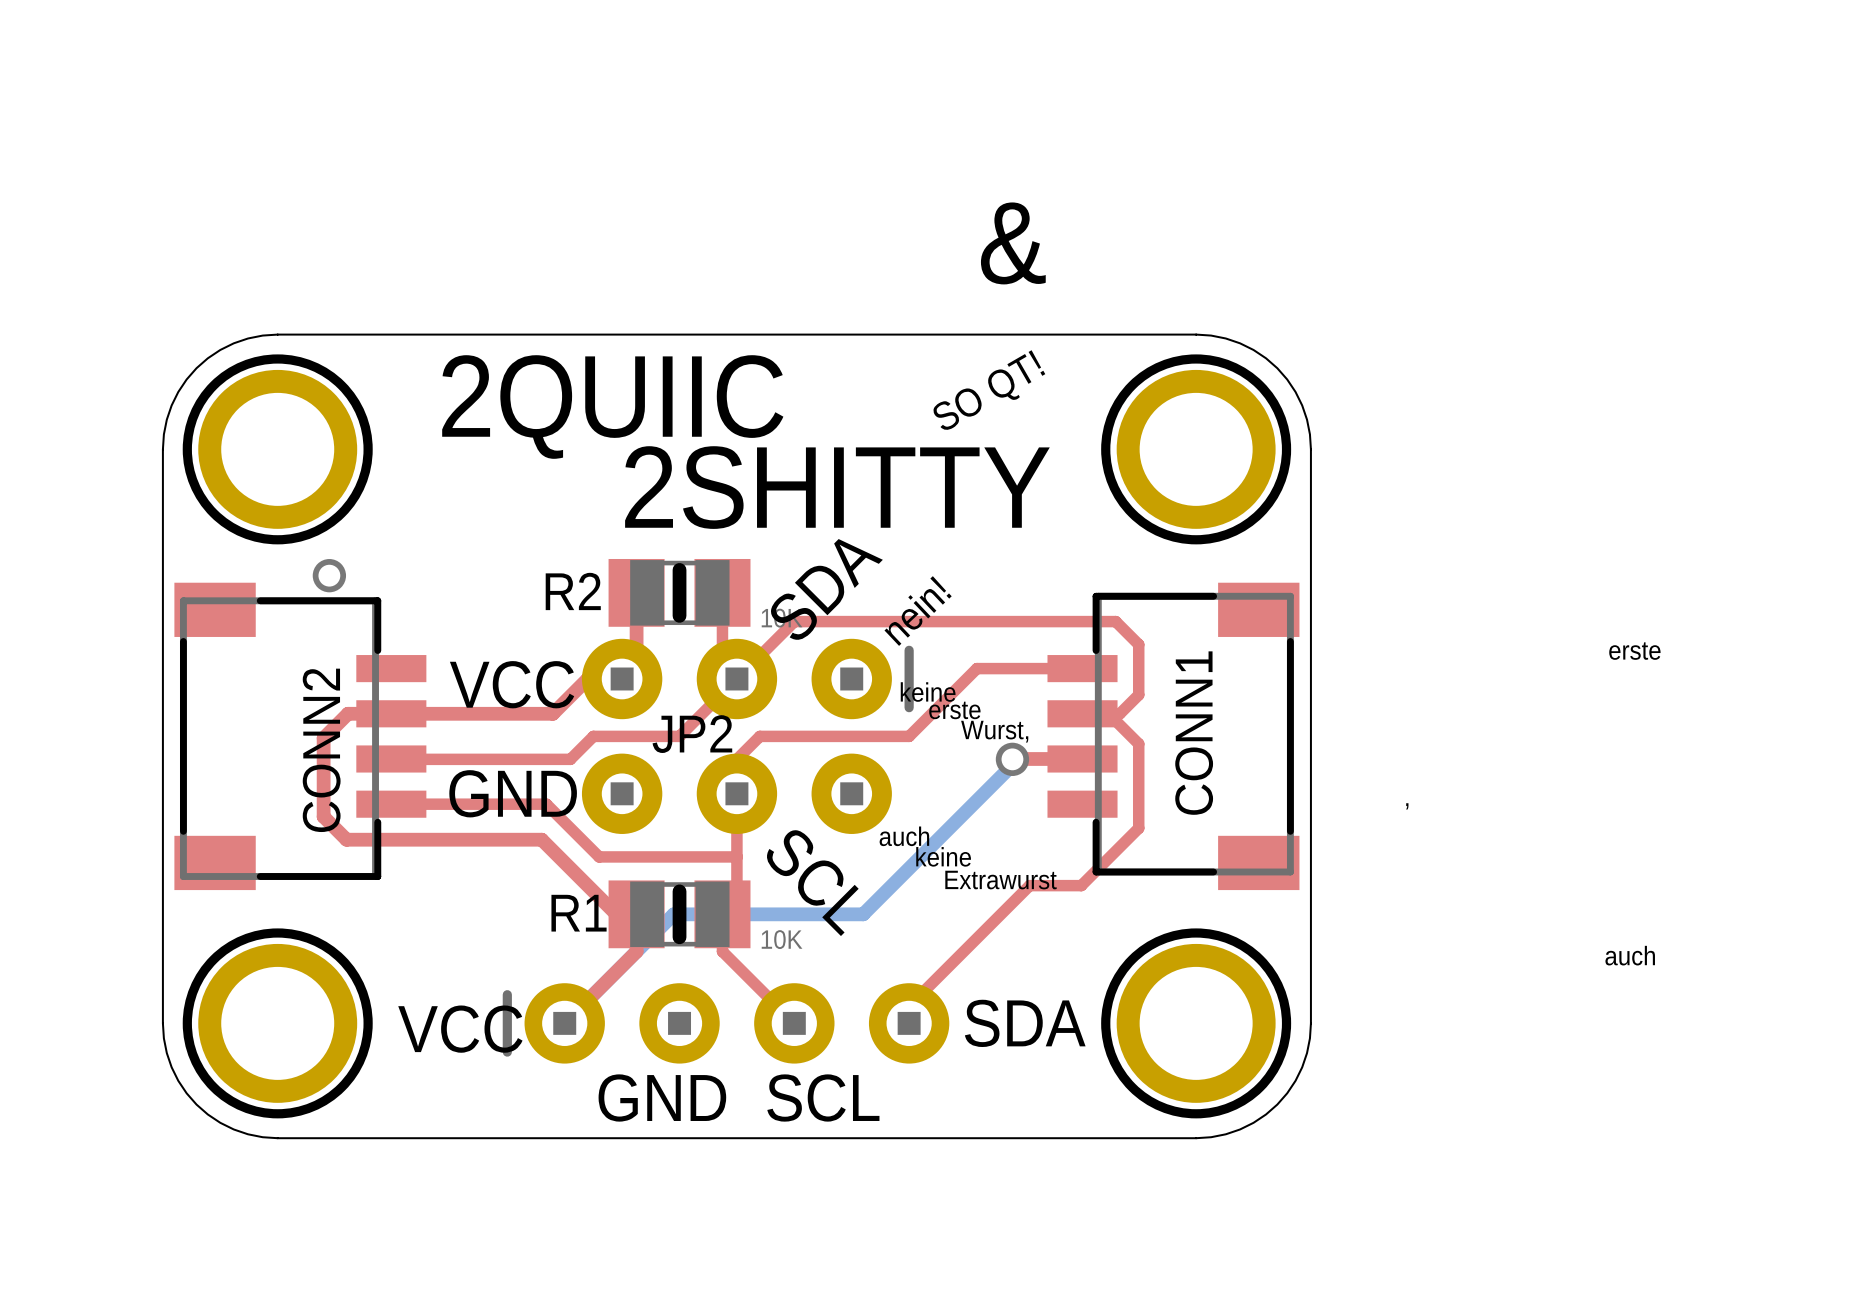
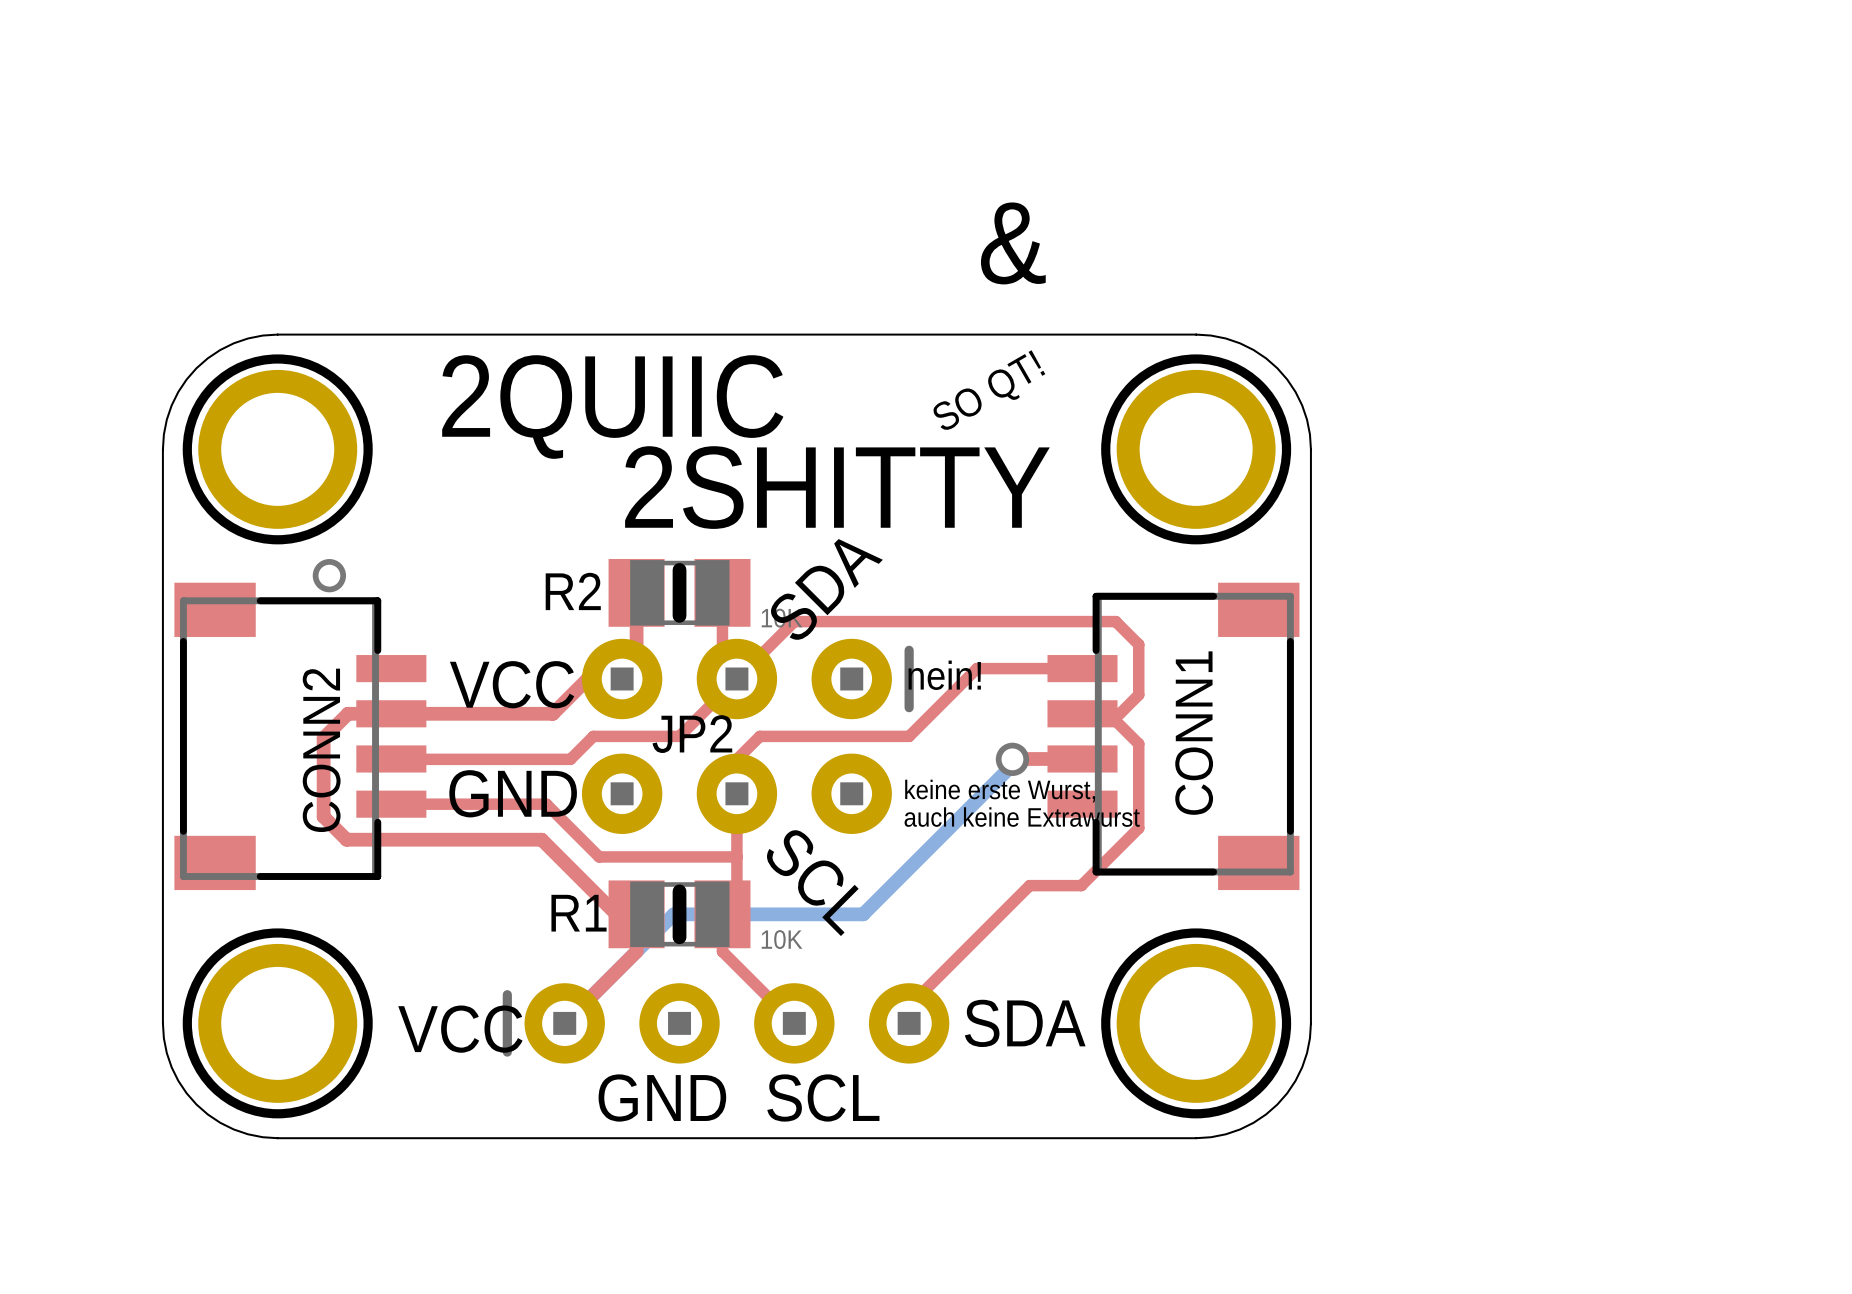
text rotation: 0° (918, 611) -> 43.3° clockwise (944, 675)
text: erste (1634, 651) -> none
text: keine (928, 692) -> none
text: erste (954, 710) -> none
text: Wurst, (994, 731) -> none
text: none -> keine erste Wurst, (1000, 791)
text: , (1407, 806) -> none
text: none -> auch keine Extrawurst (1022, 817)
text: auch (904, 836) -> none
text: keine (943, 856) -> none
text: Extrawurst (1000, 880) -> none
text: auch (1630, 955) -> none

